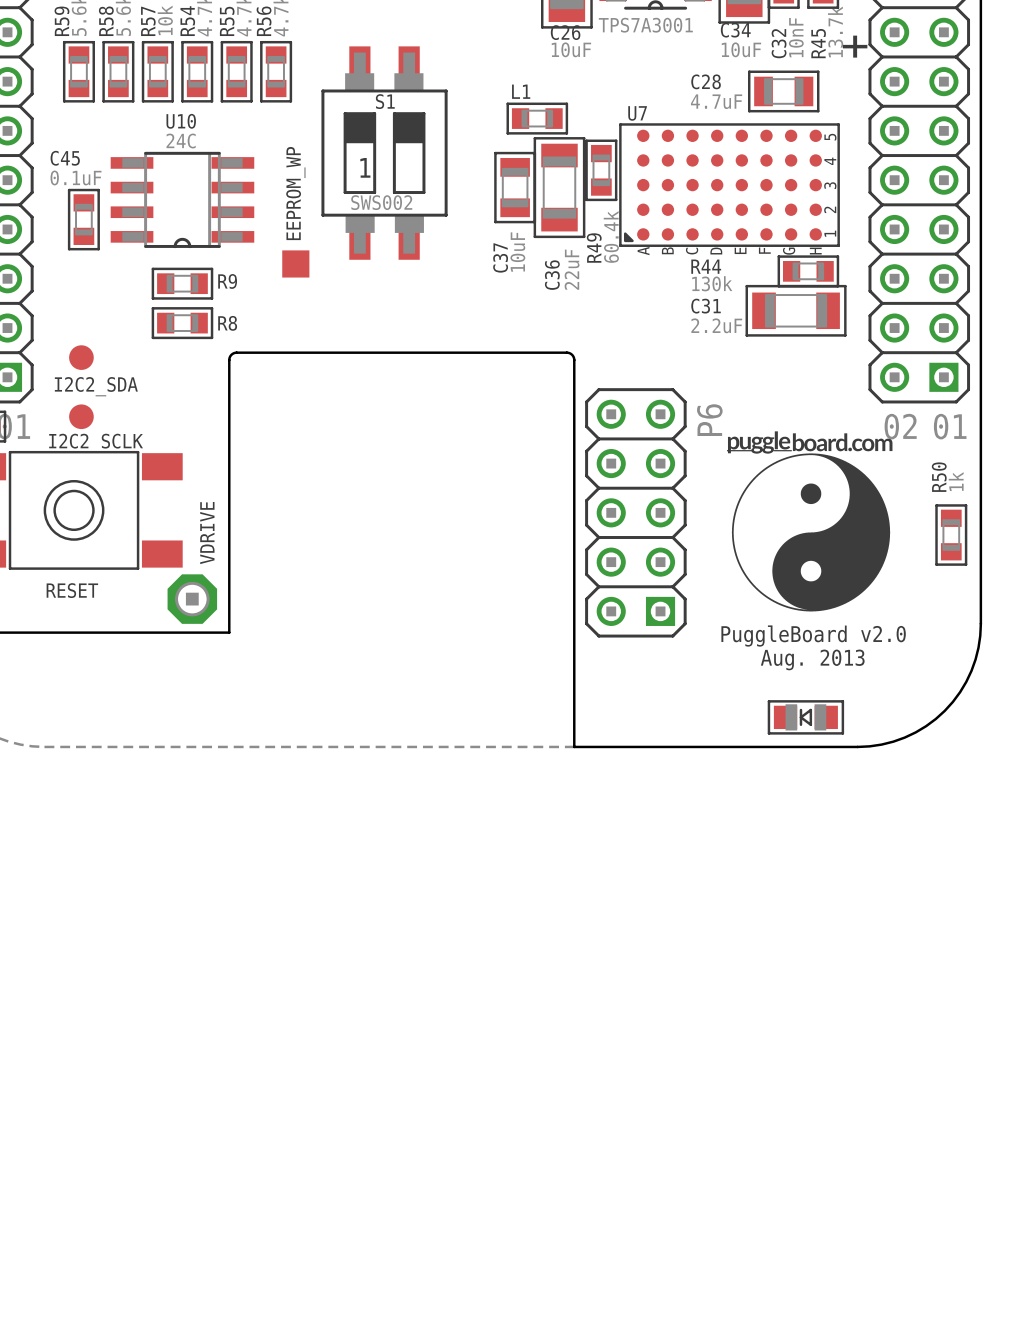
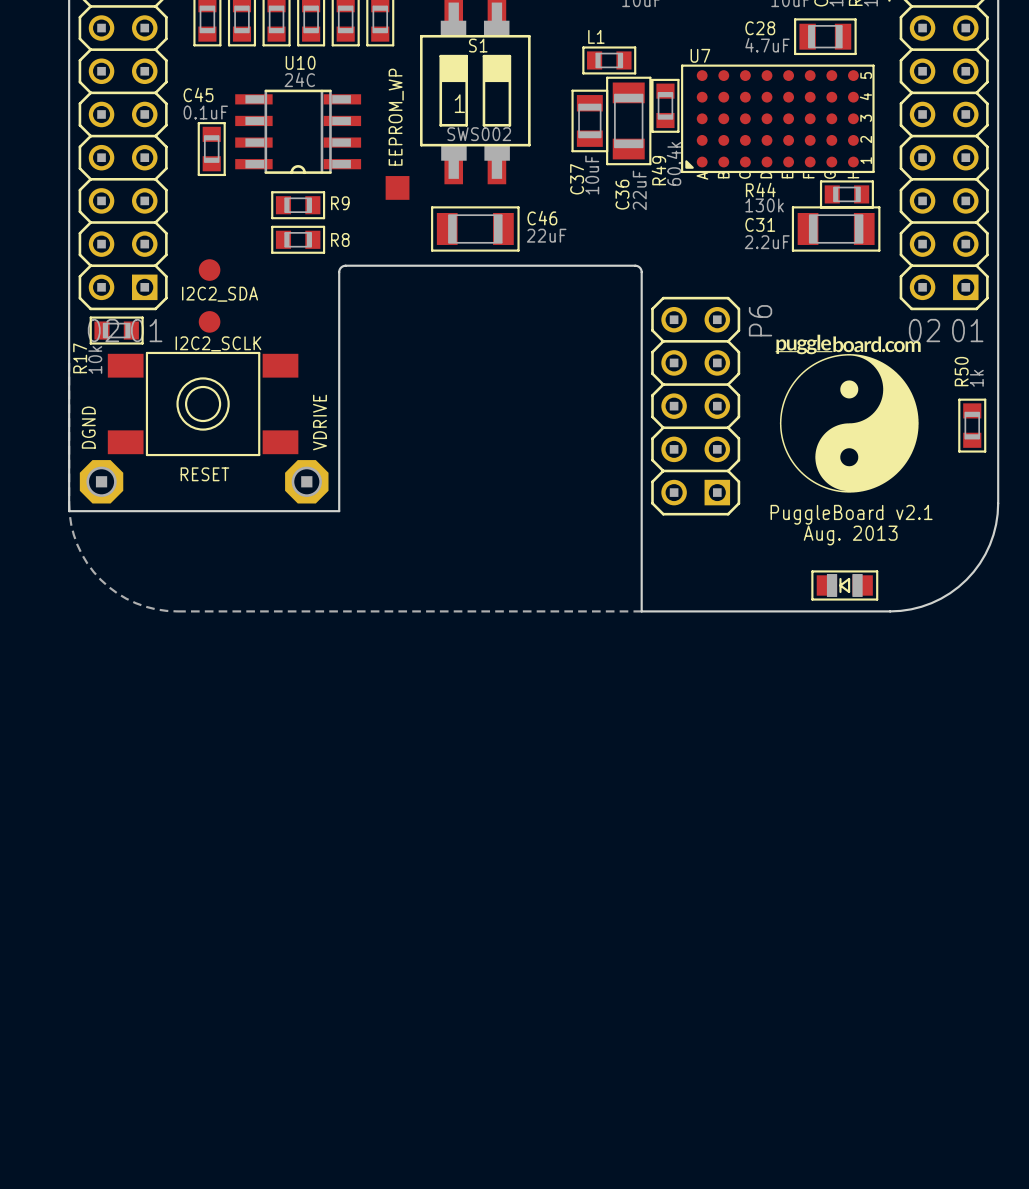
C46: none -> 22uF (475, 228)
text: PuggleBoard v2.0 (813, 636) -> PuggleBoard v2.1 (851, 514)

